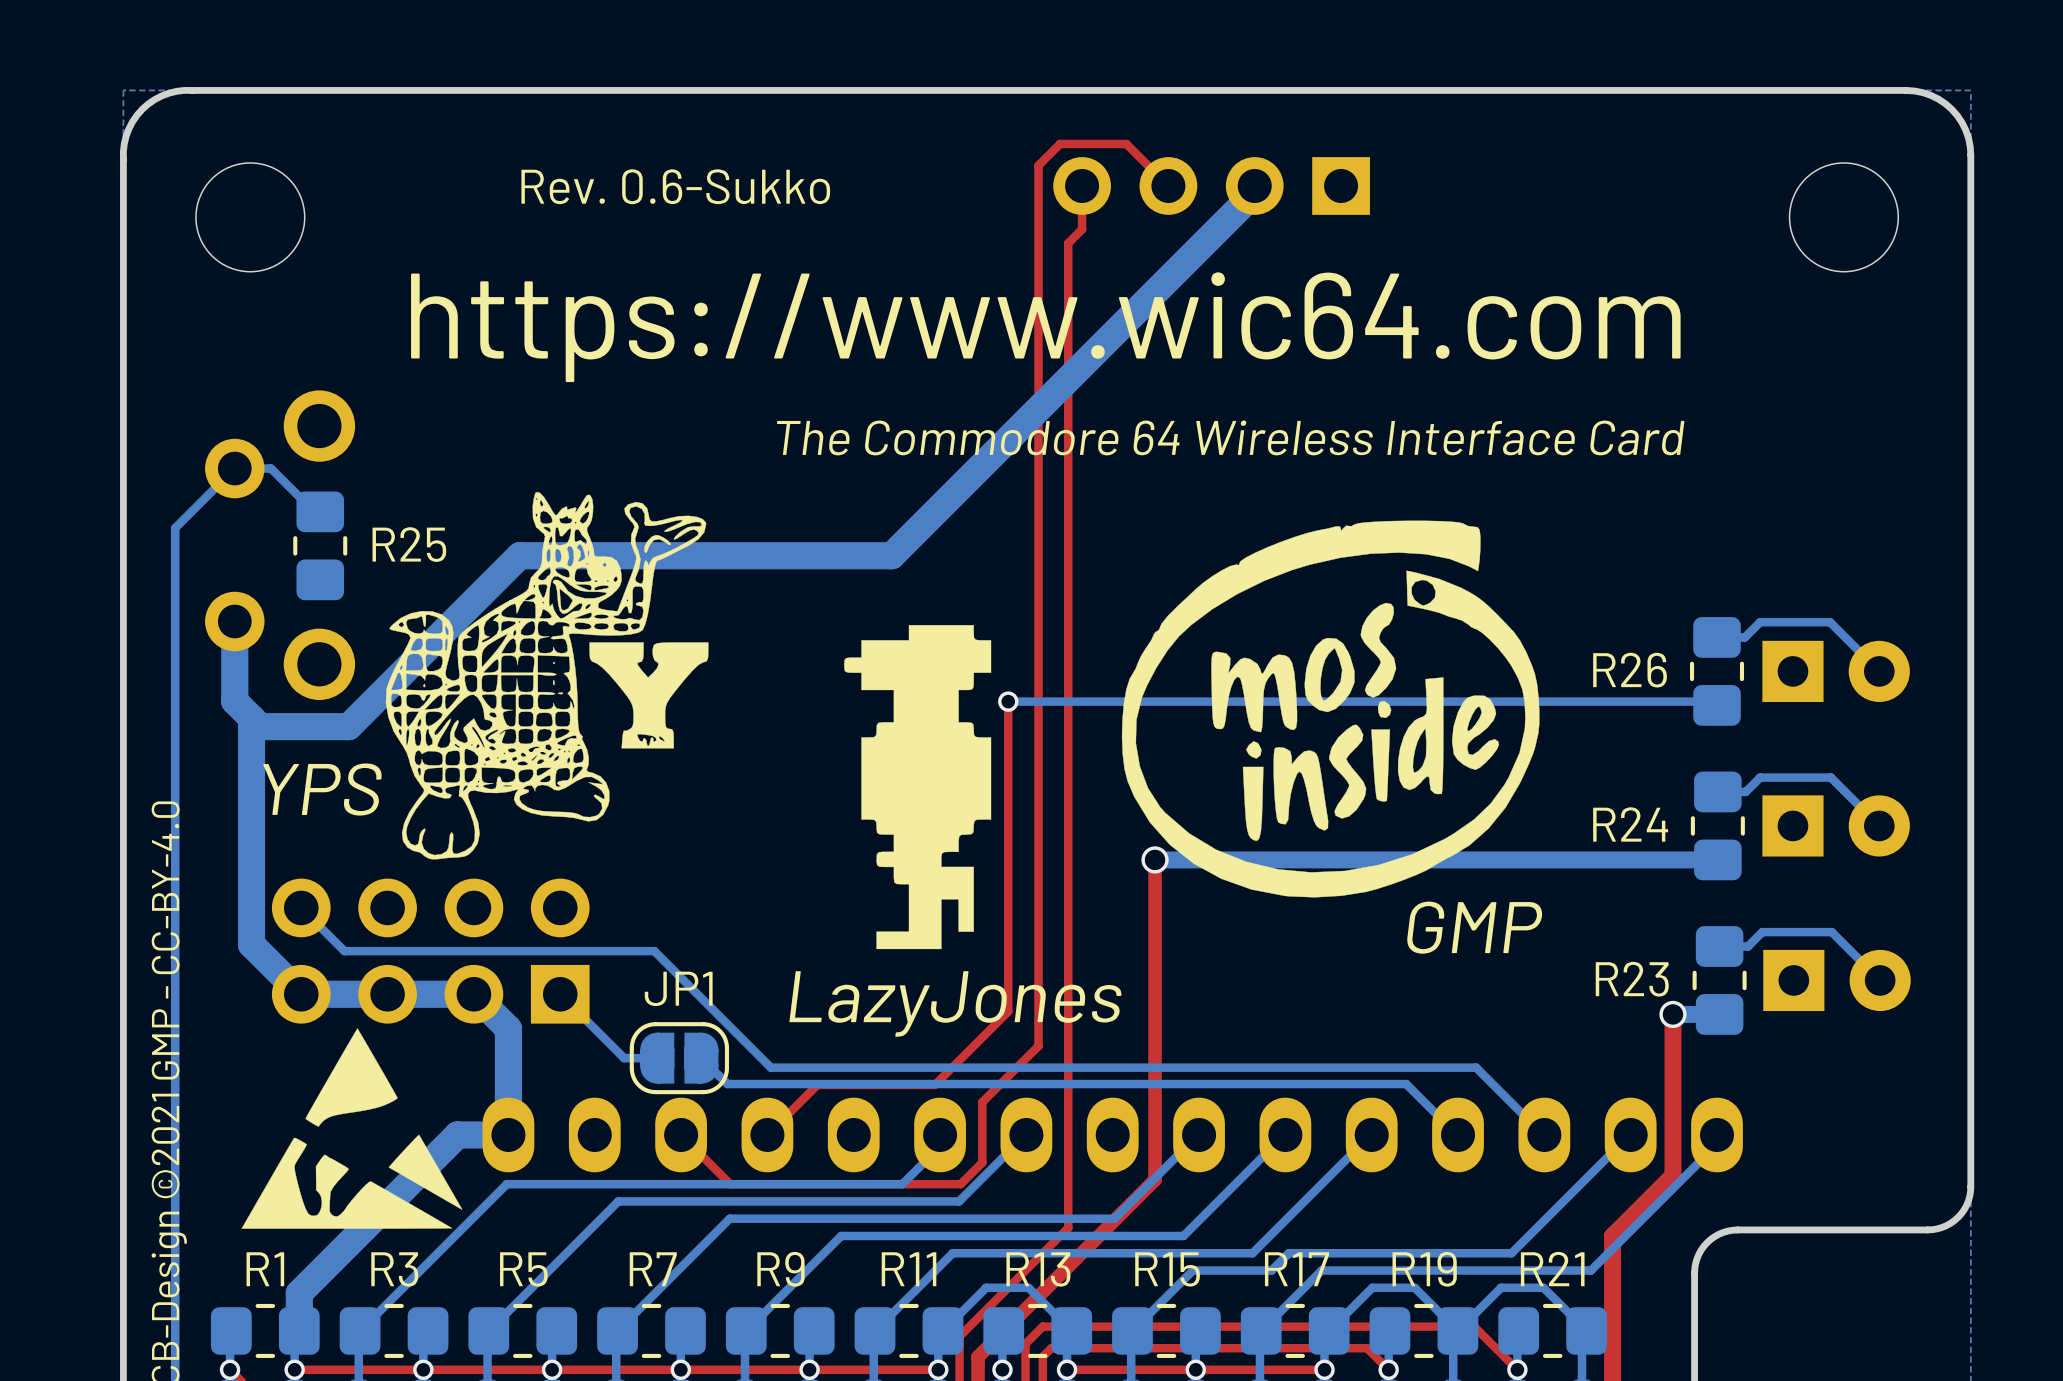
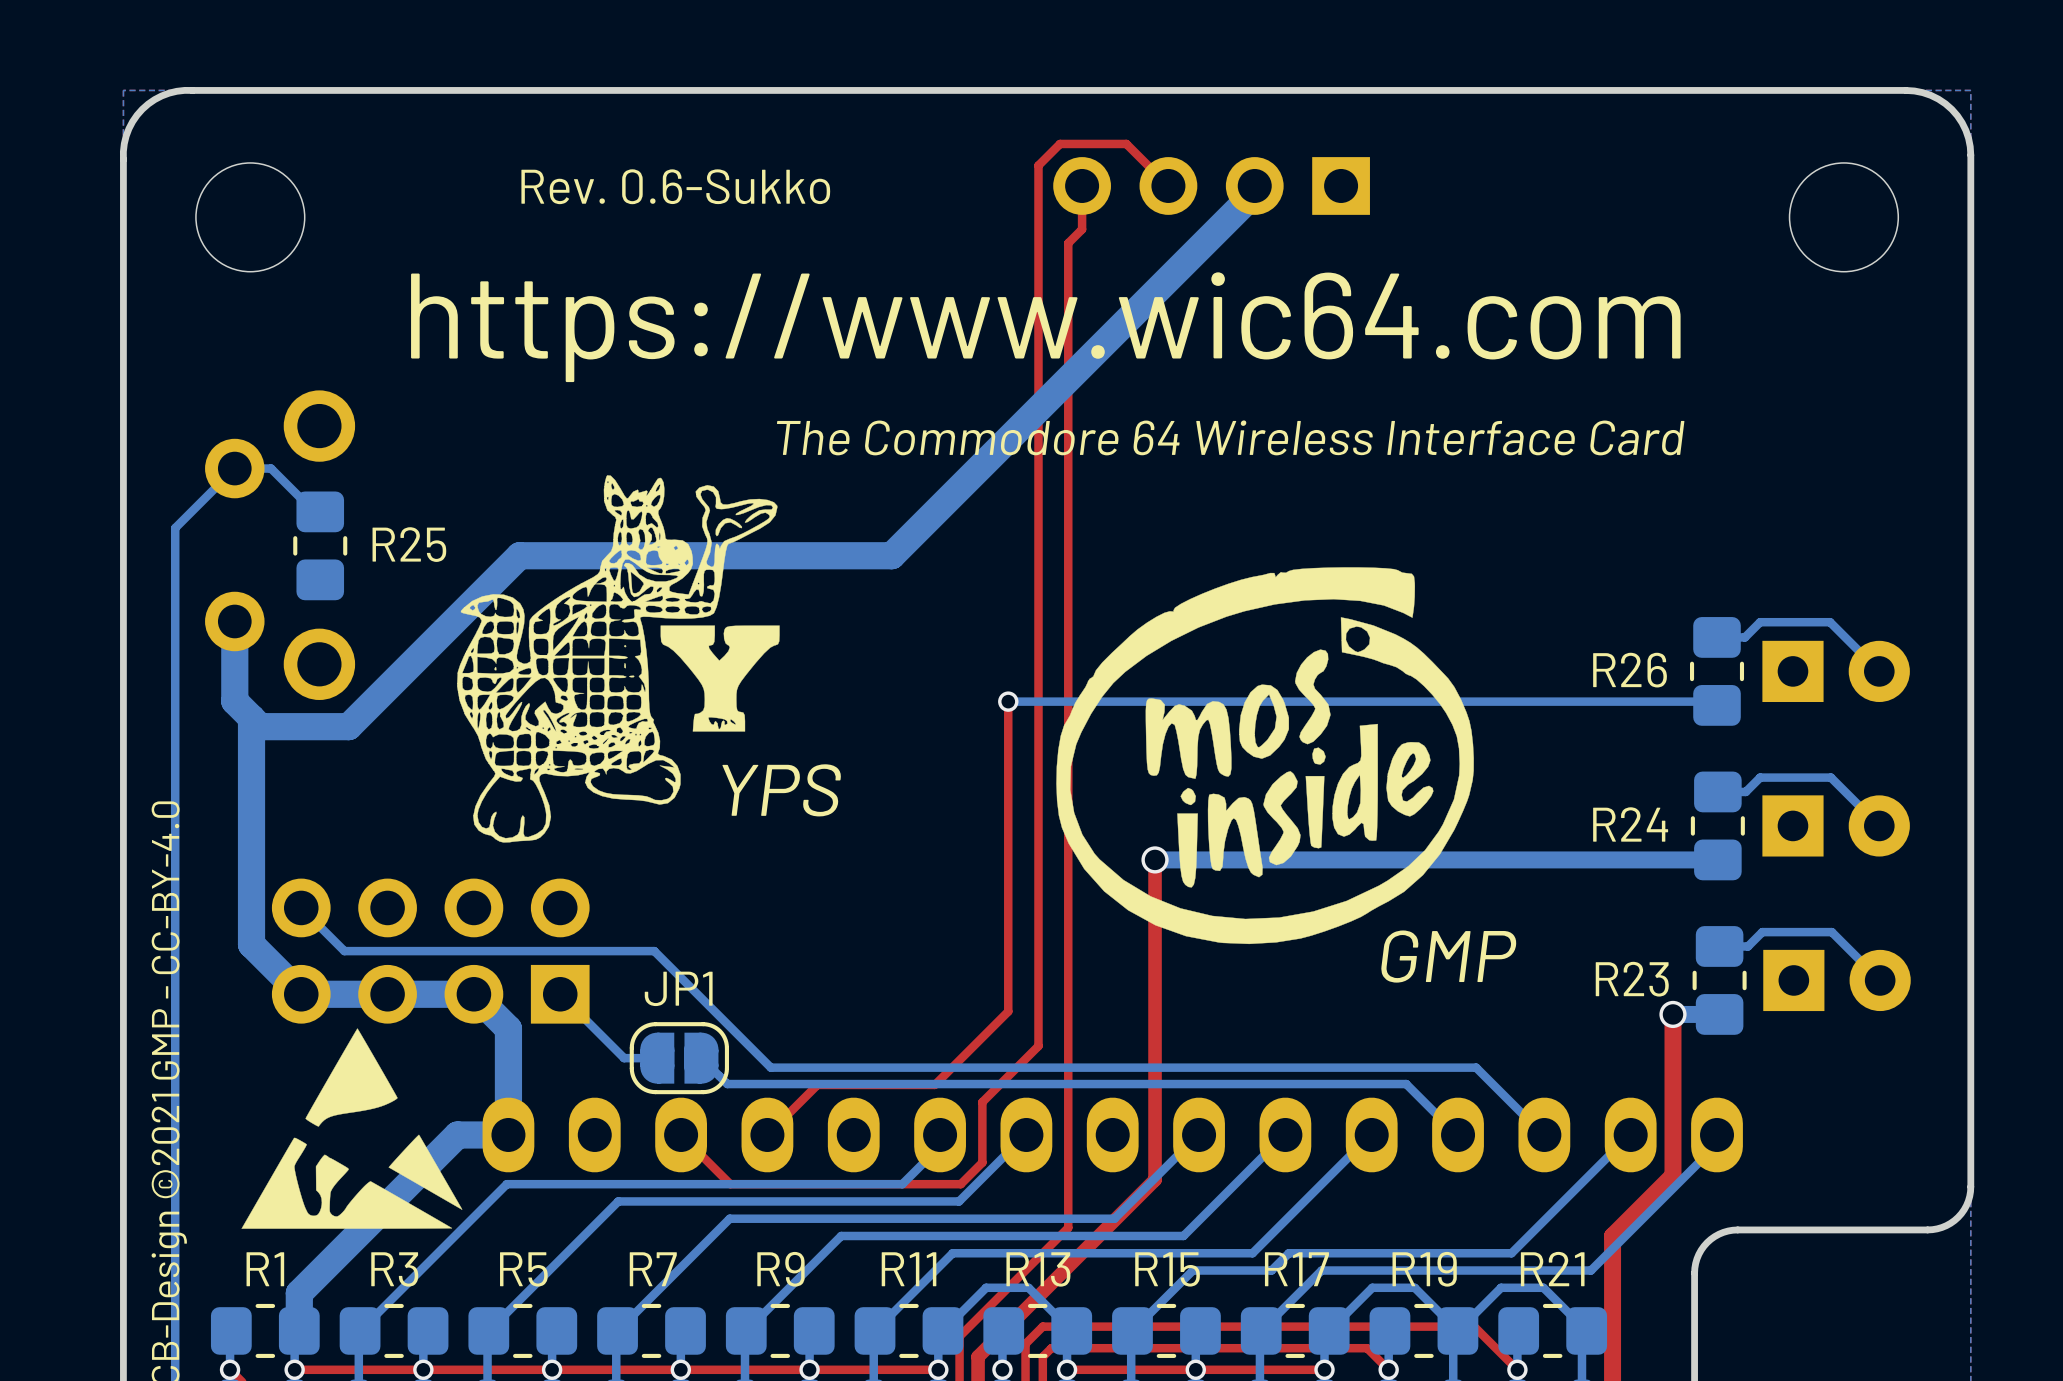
drawing: [844, 625, 992, 950] -> none
drawing position: (547, 675) -> (618, 658)
drawing position: (1330, 709) -> (1265, 755)
text position: YPS (322, 789) -> YPS (781, 790)
text position: GMP (1474, 927) -> GMP (1448, 956)
text: LazyJones (955, 1003) -> none

